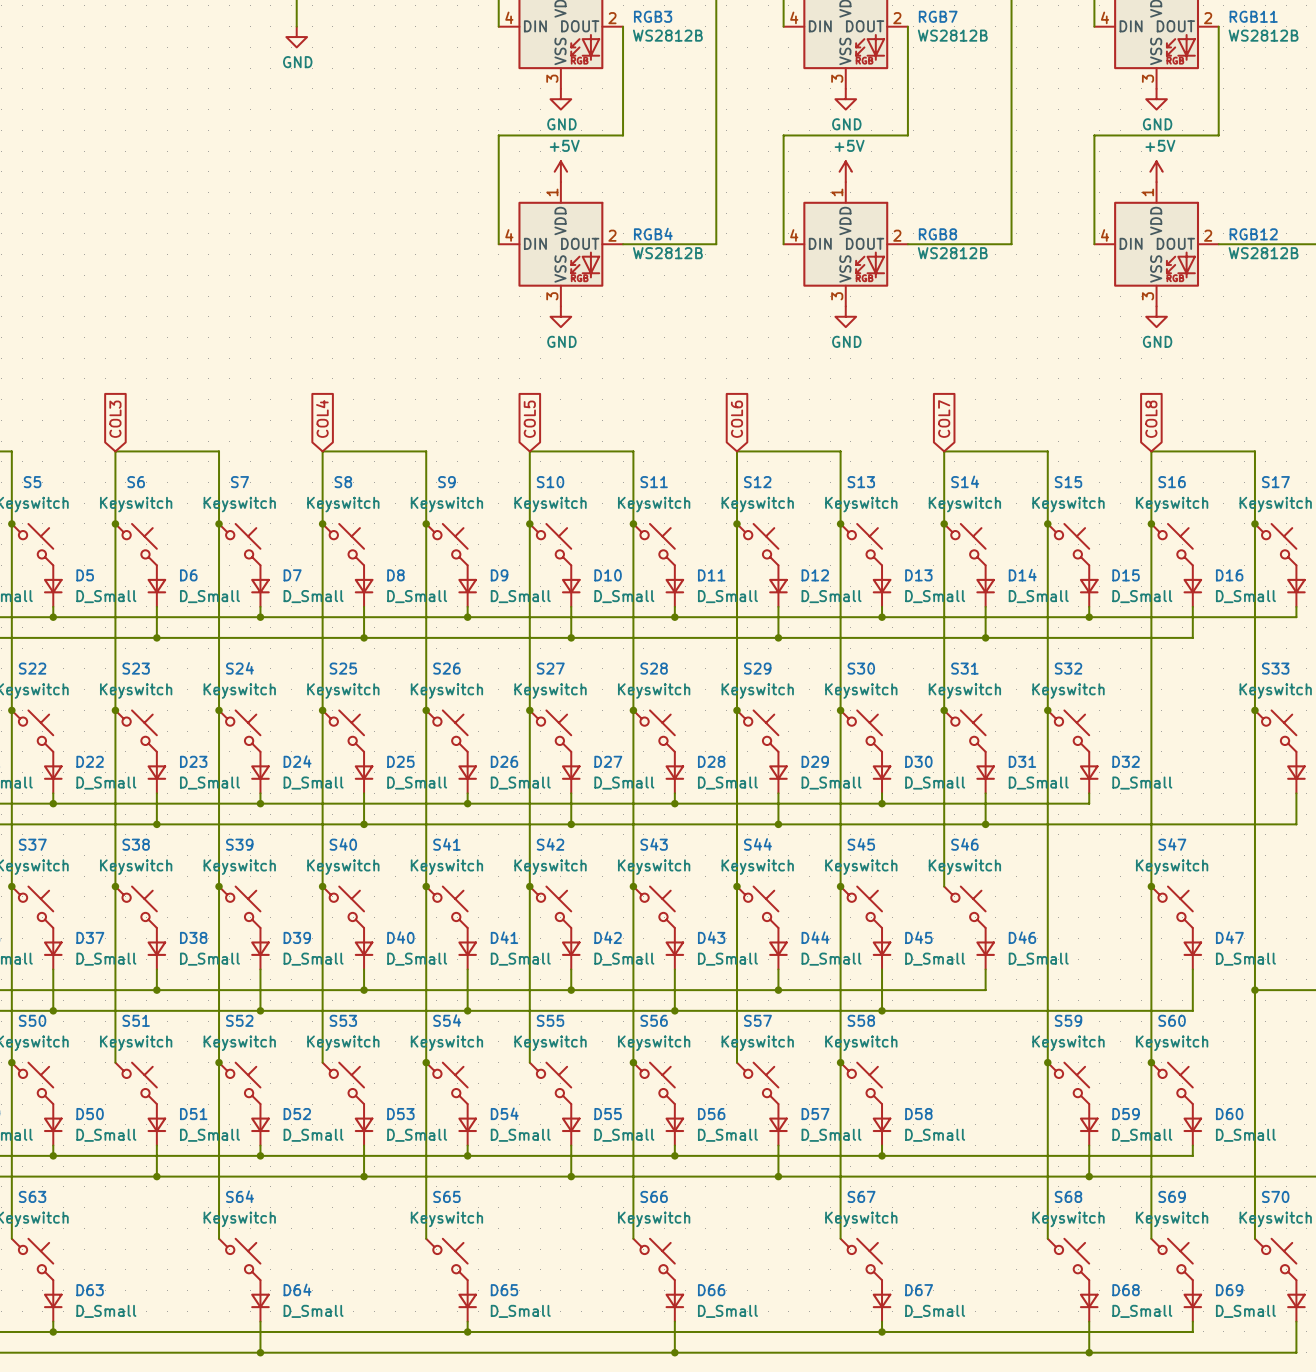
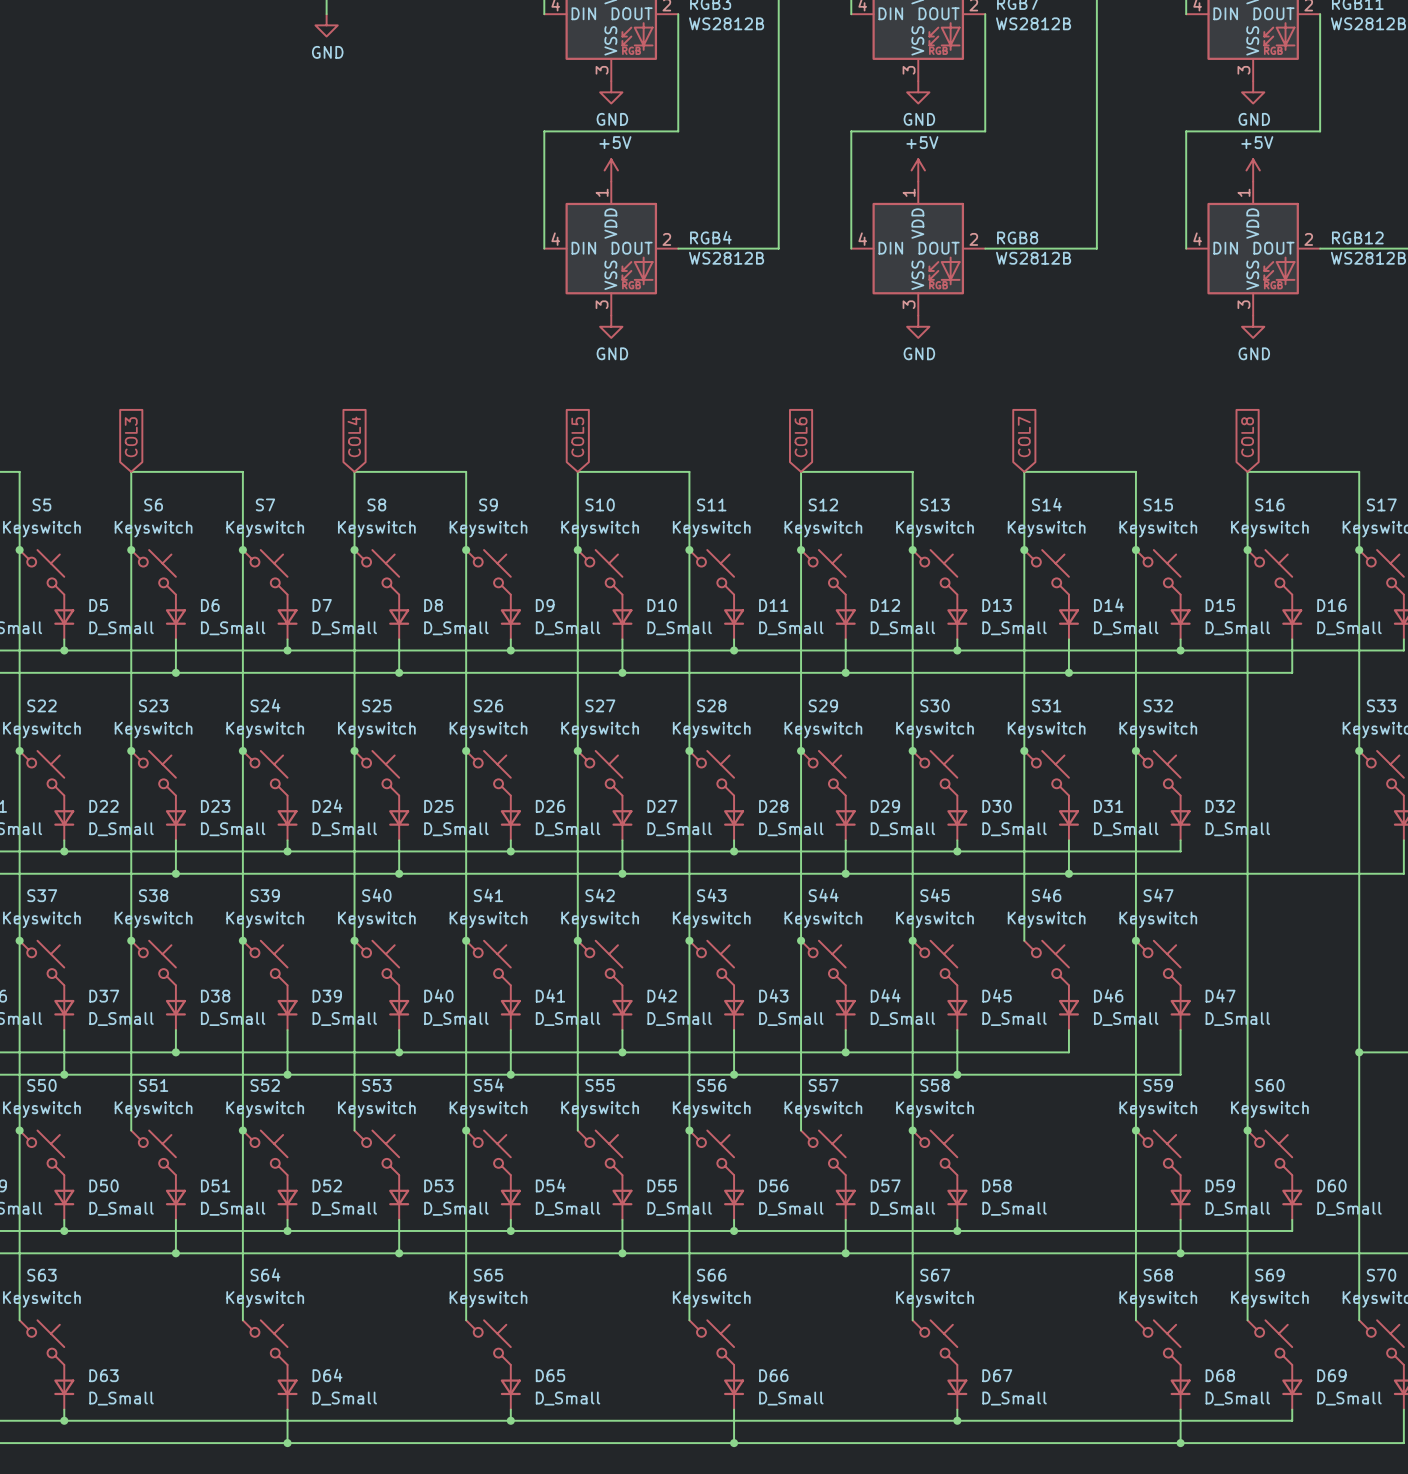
junction: none -> (1135, 940)
junction: (1151, 886) -> none
S47 position: (1172, 907) -> (1158, 963)
D47 position: (1192, 948) -> (1180, 1007)
wire: (1192, 969) (1192, 1010) (1089, 1010) -> (1180, 1030) (1180, 1074)

